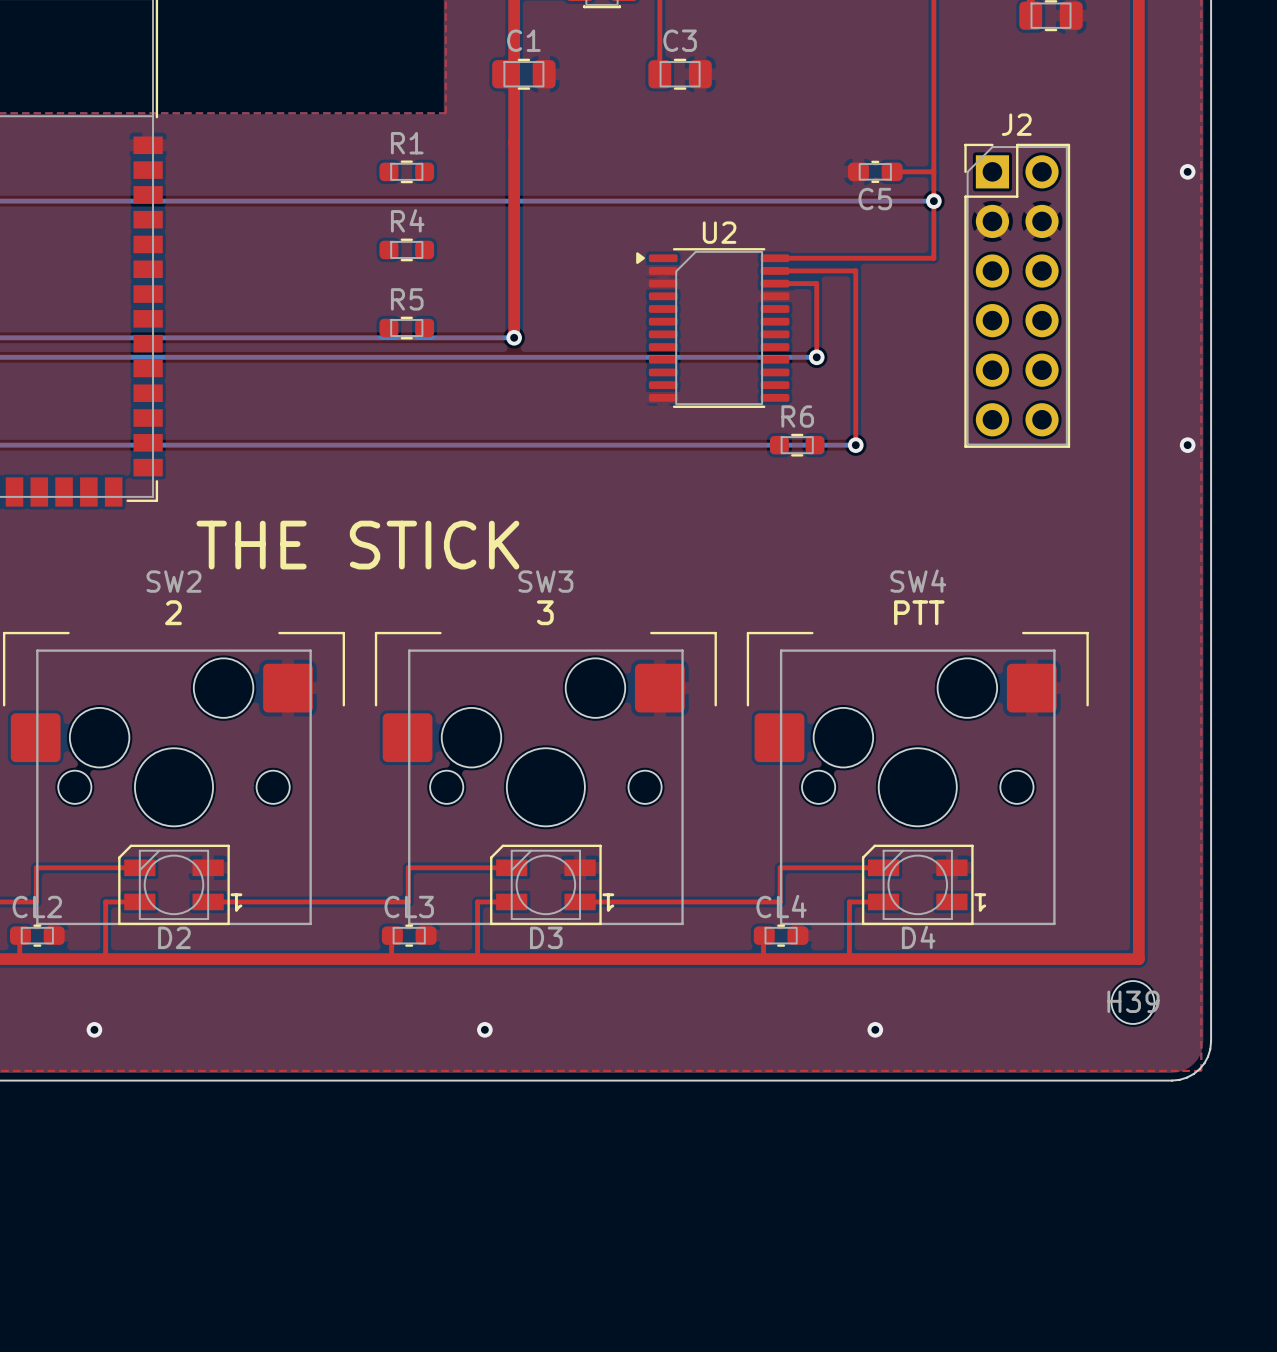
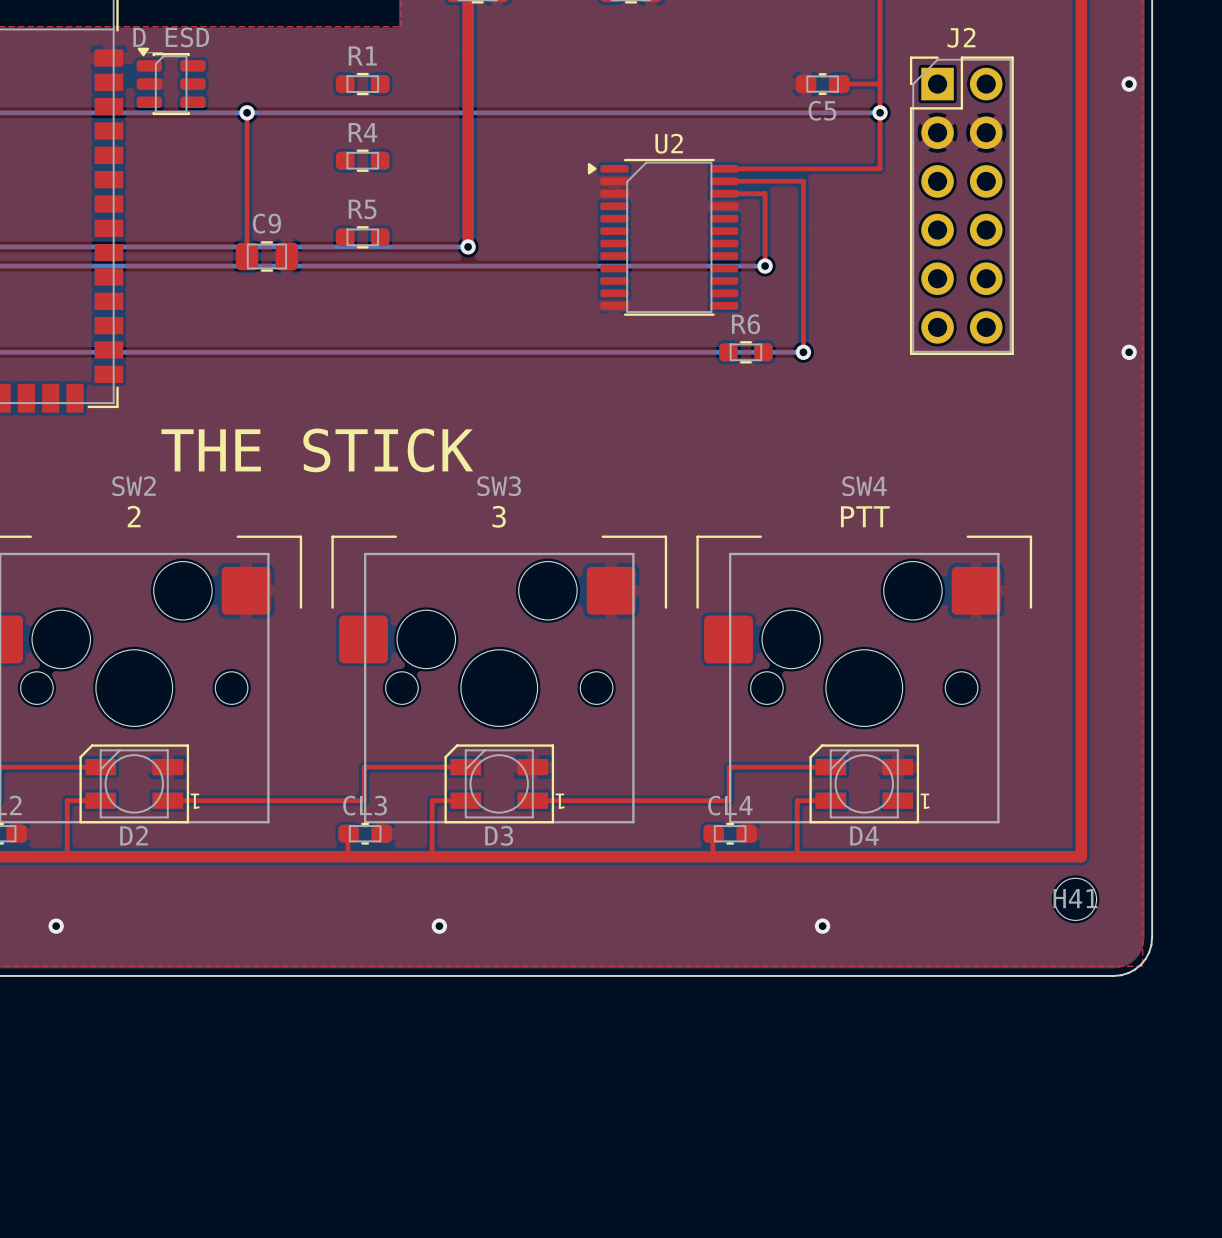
D_ESD: none -> (171, 81)
top track: none -> (247, 112) (247, 256)
via: none -> (247, 112)
C9: none -> (266, 256)
H39 name: H39 (1133, 1001) -> H41 (1075, 898)

